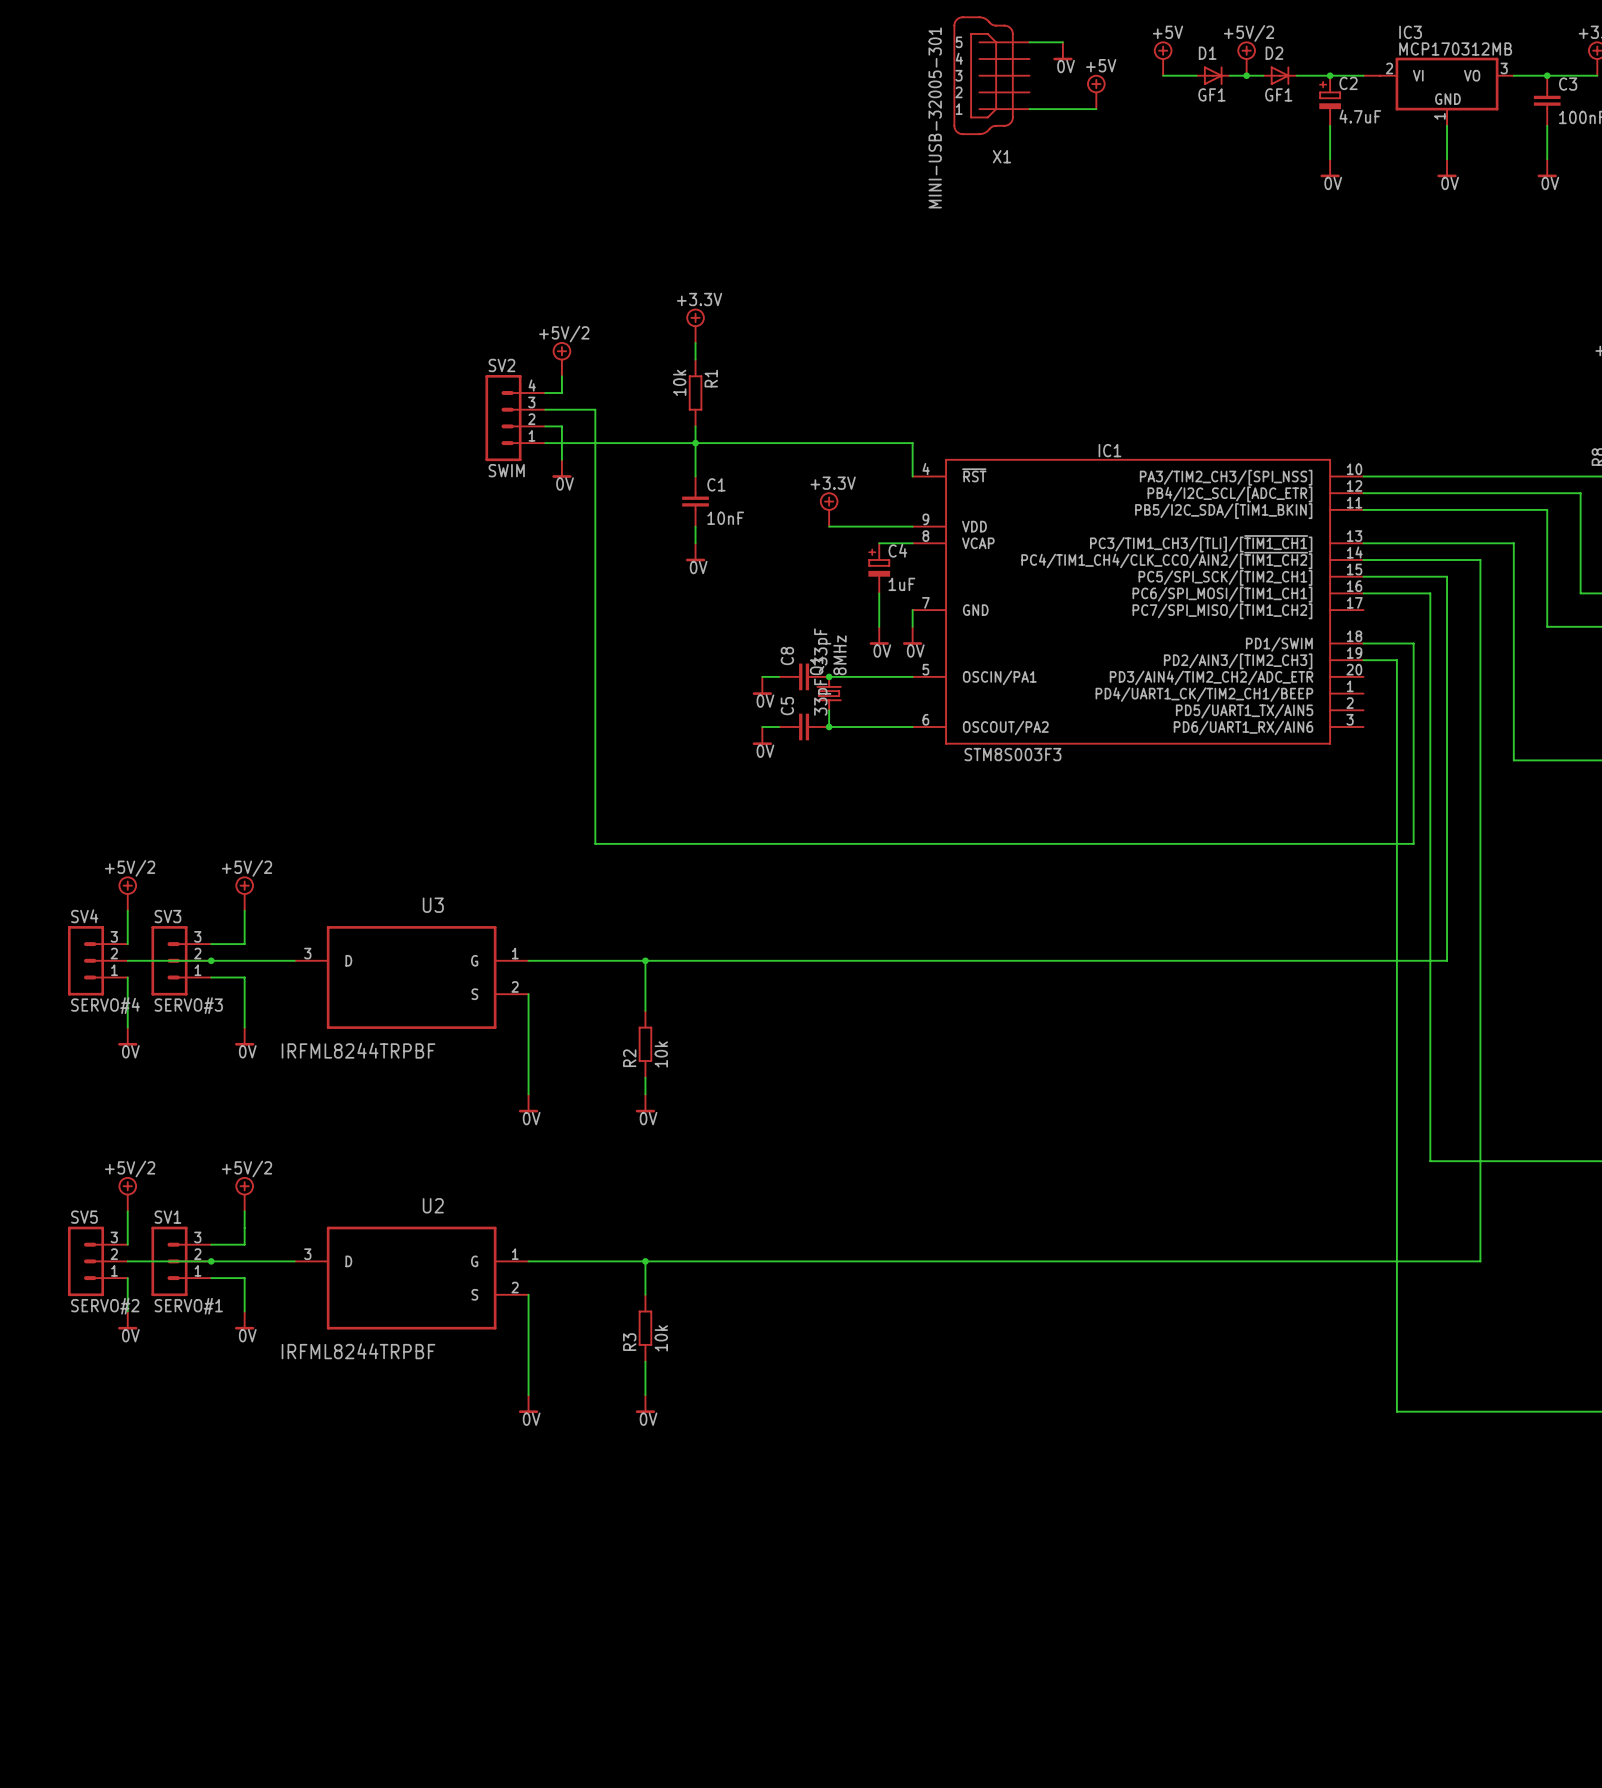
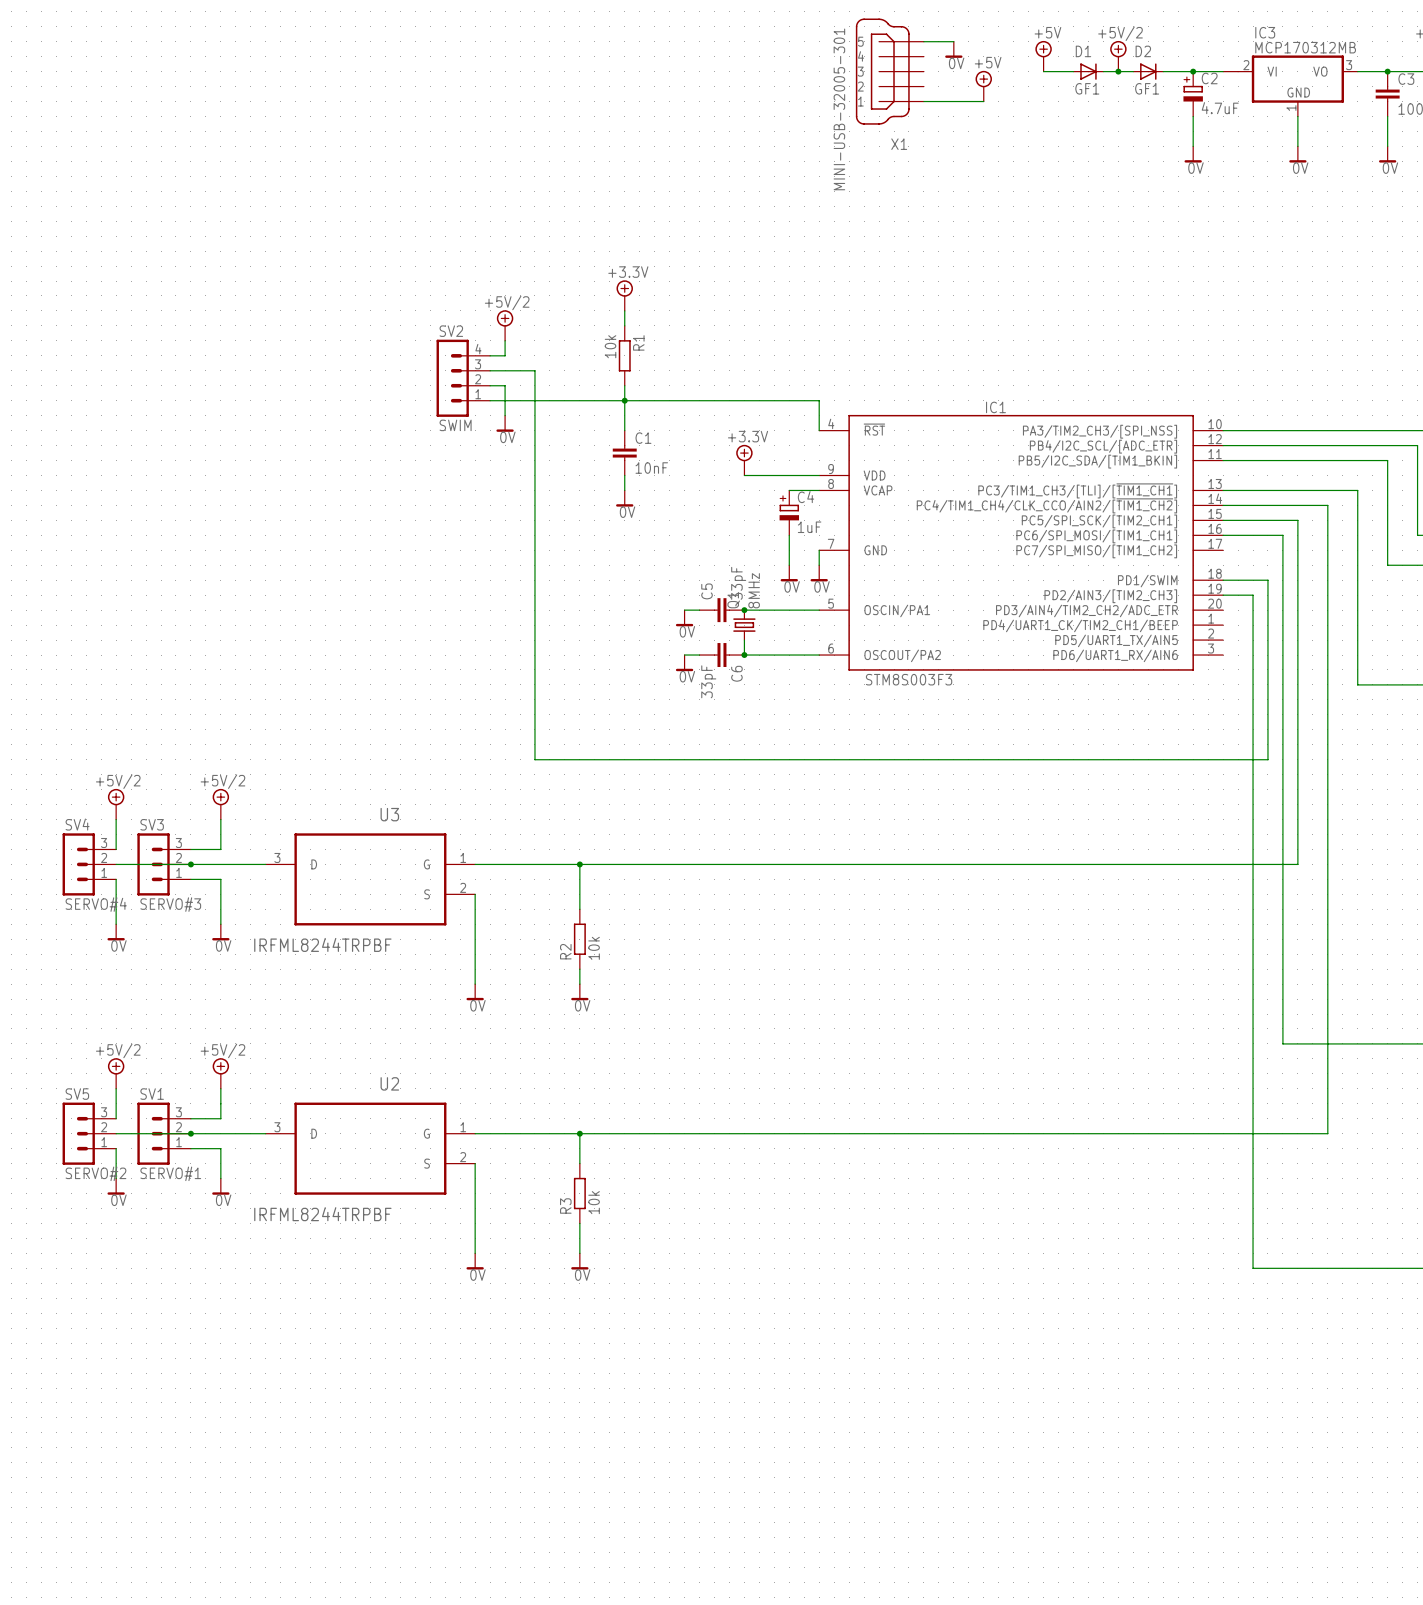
C8 name: C8 (787, 656) -> C5 (707, 591)
C5 value position: 33pF (822, 697) -> 33pF (708, 681)
C5 name: C5 (787, 706) -> C6 (736, 673)

